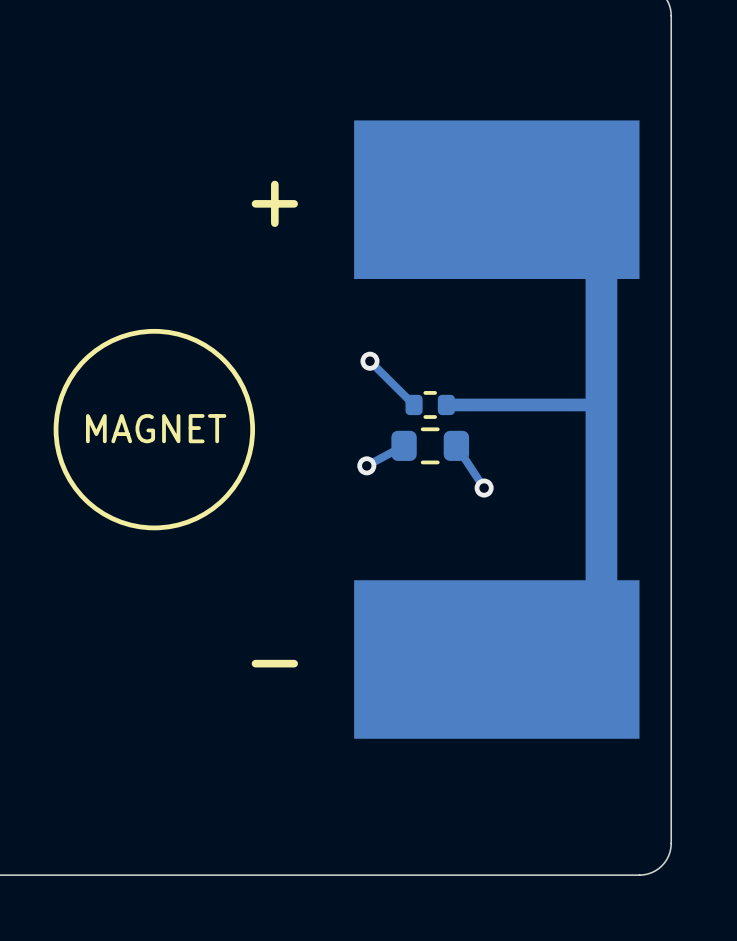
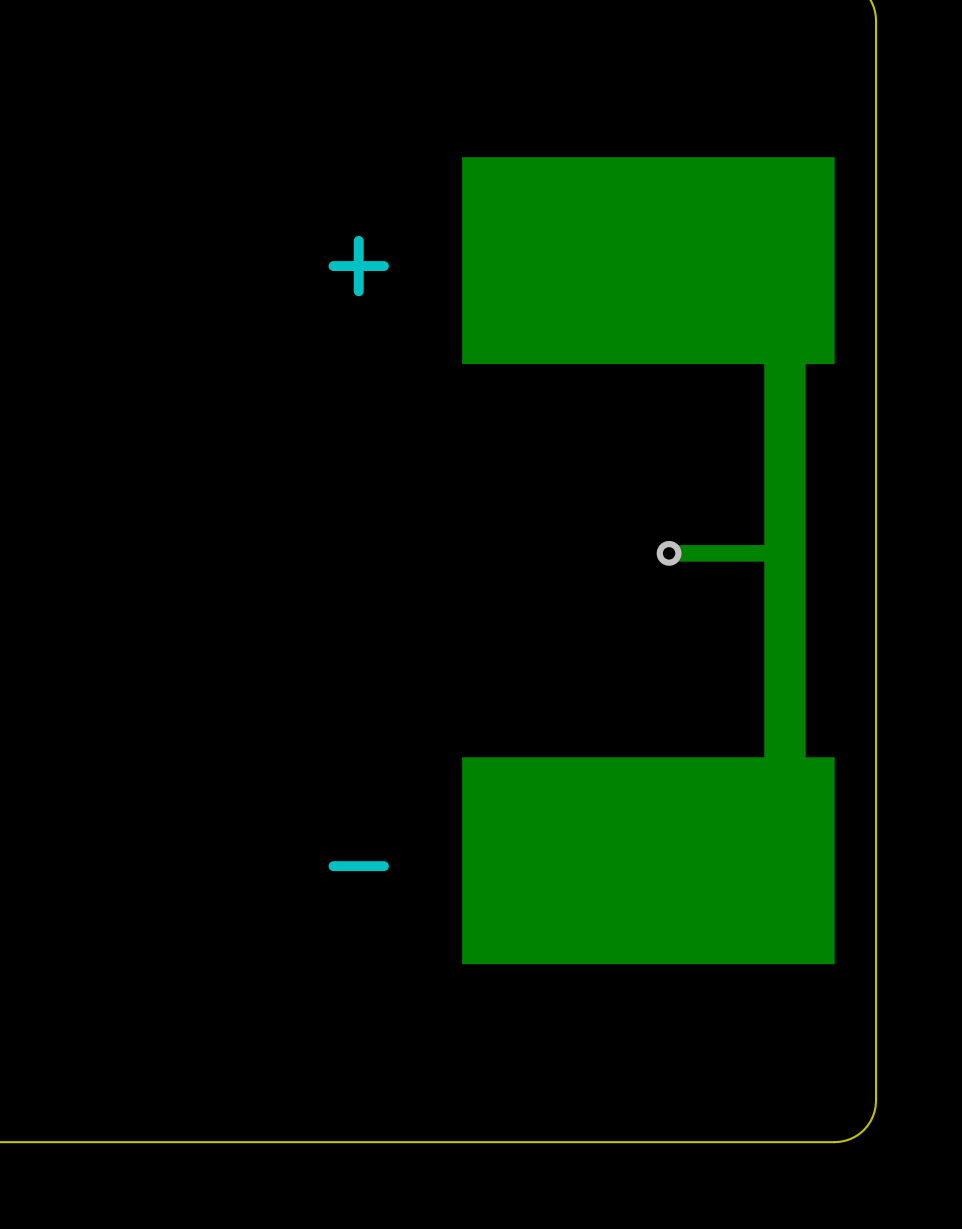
drawing: [53, 328, 256, 531] -> none
track: (369, 361) (414, 404) -> none
via: (369, 361) -> none
part: (430, 404) -> none
track: (601, 404) (446, 404) -> none
track: none -> (784, 553) (669, 553)
text: MAGNET (156, 428) -> none
track: (404, 445) (366, 465) -> none
part: (430, 445) -> none
track: (456, 445) (484, 488) -> none
via: (366, 465) -> none
via position: (484, 488) -> (669, 553)

